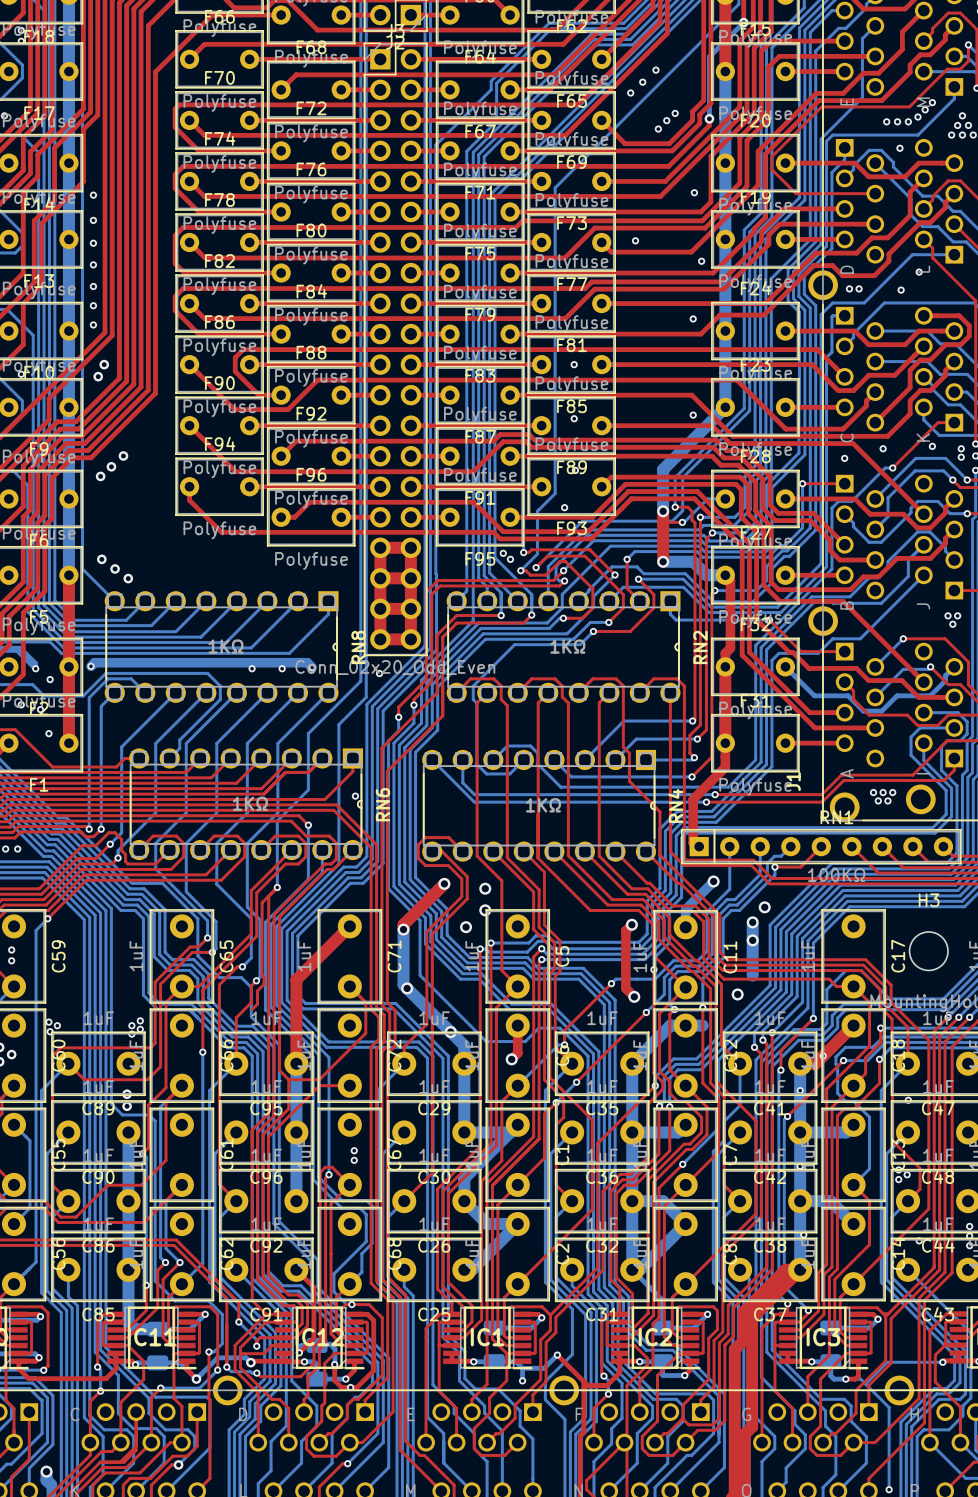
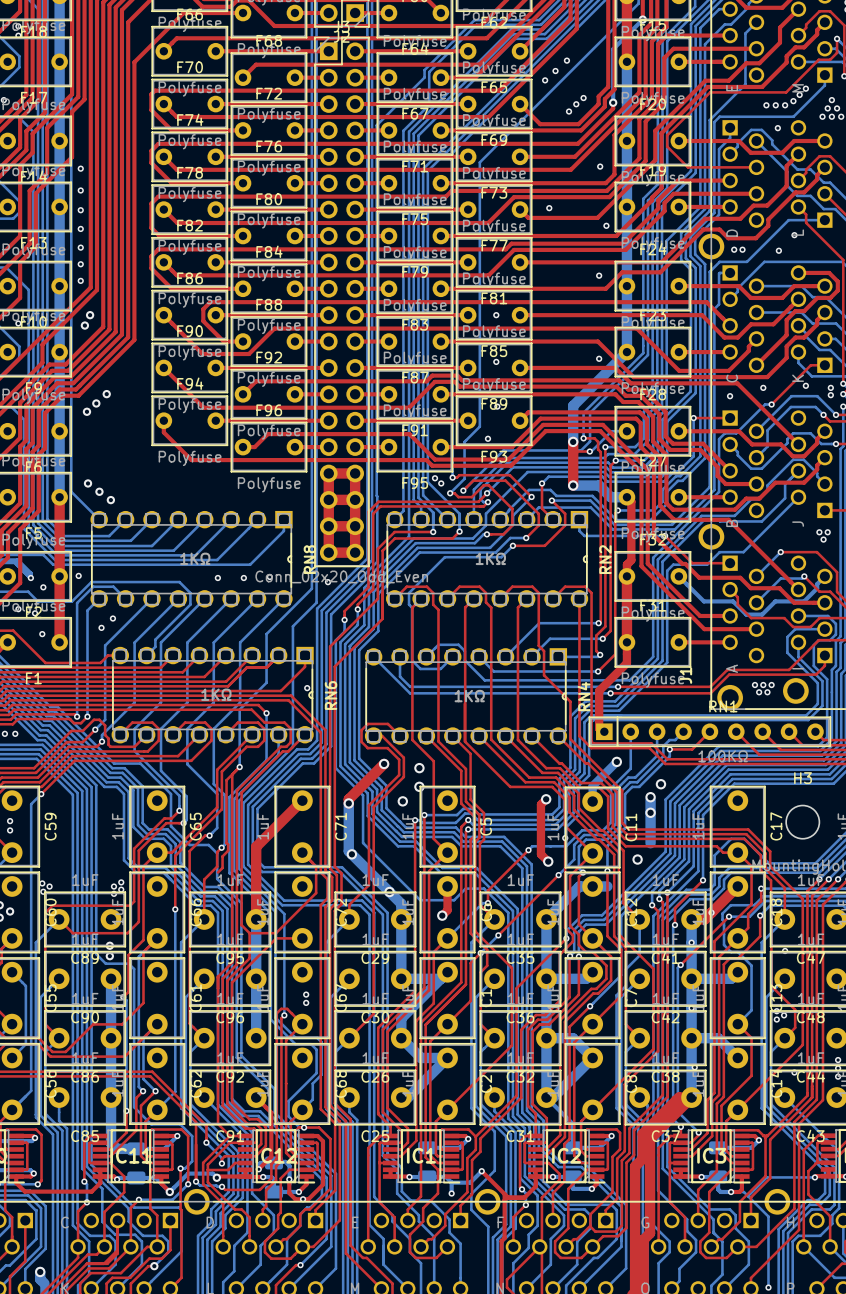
bottom track: (91, 666) (94, 662) (307, 662) (312, 667) -> none
via: none -> (112, 618)
via: none -> (101, 627)

